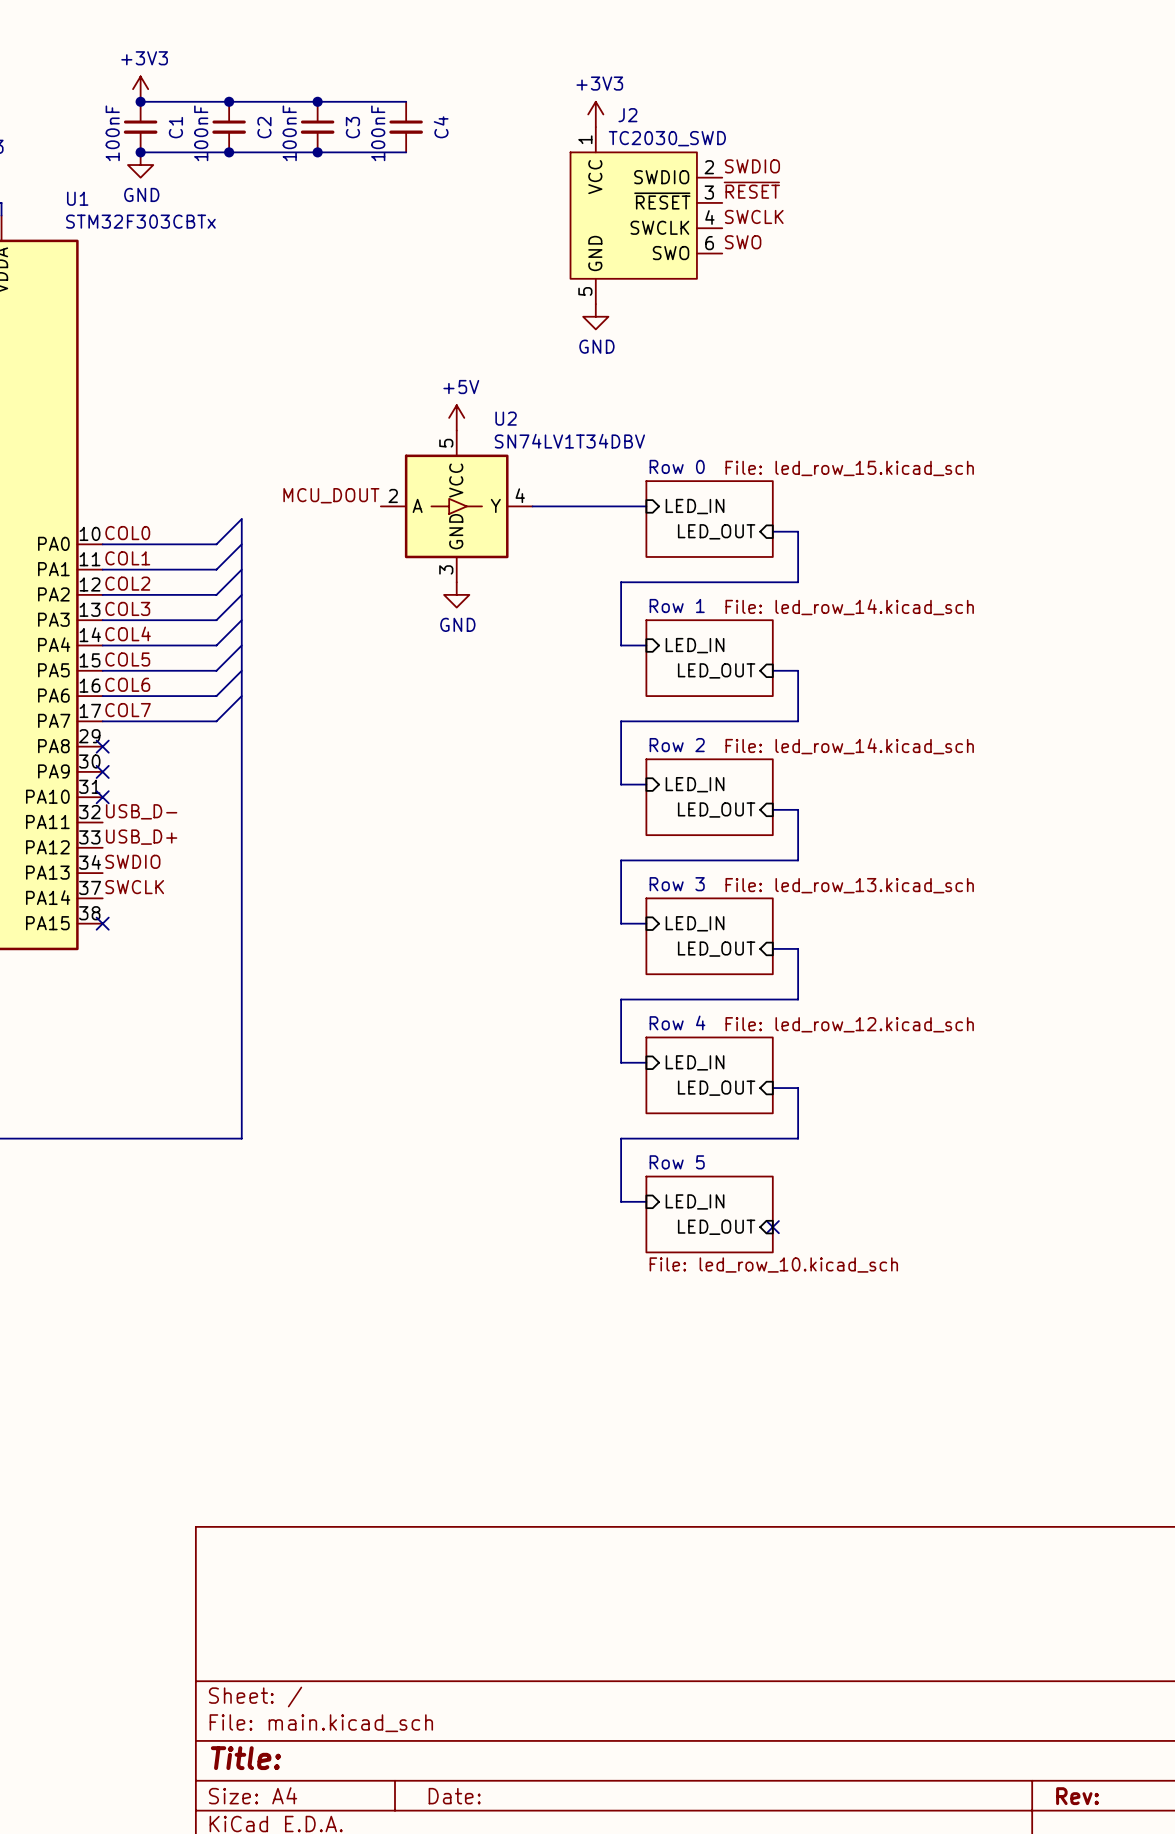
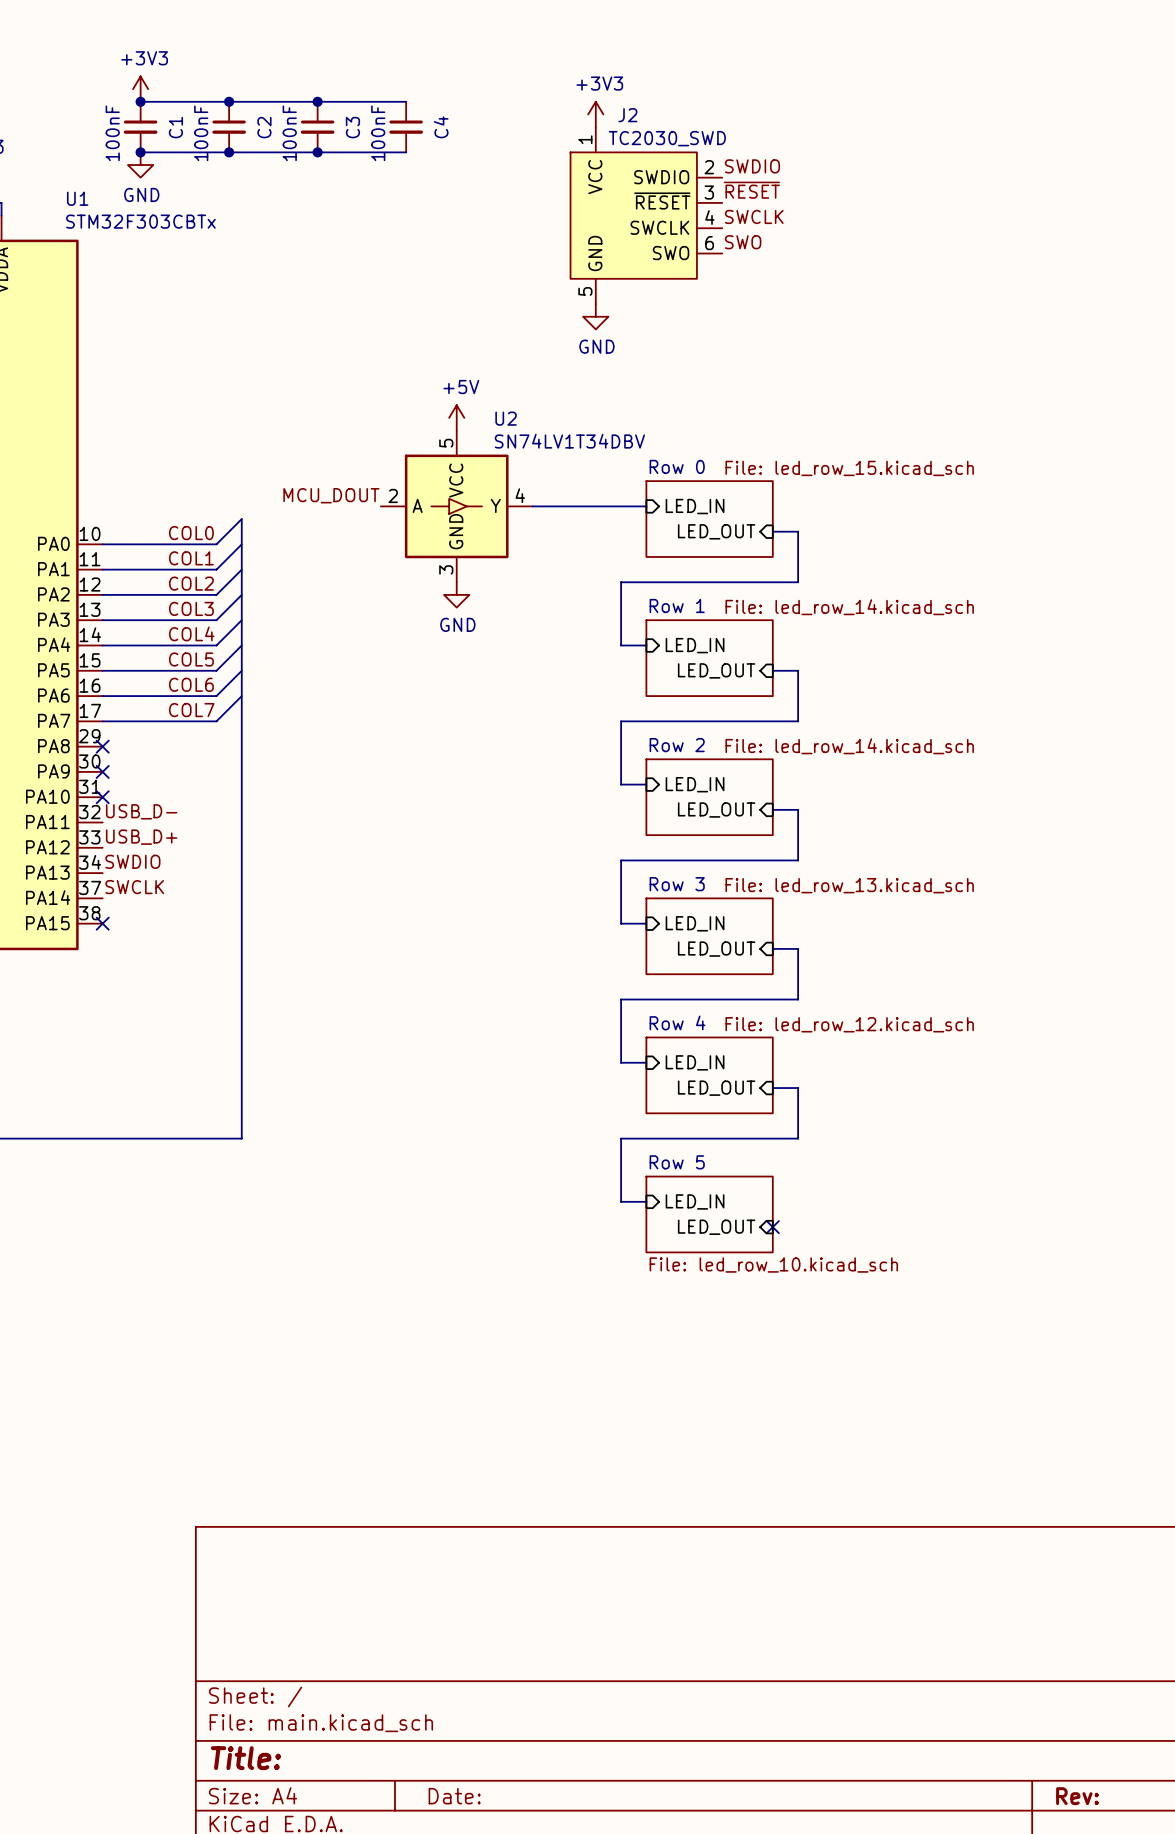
label position: COL0 (127, 533) -> COL0 (191, 533)
label position: COL1 (127, 558) -> COL1 (191, 558)
label position: COL2 (127, 583) -> COL2 (191, 583)
label position: COL3 (127, 608) -> COL3 (191, 608)
label position: COL4 (128, 633) -> COL4 (191, 633)
label position: COL5 (127, 659) -> COL5 (191, 659)
label position: COL6 (127, 684) -> COL6 (191, 684)
label position: COL7 (128, 710) -> COL7 (191, 710)

